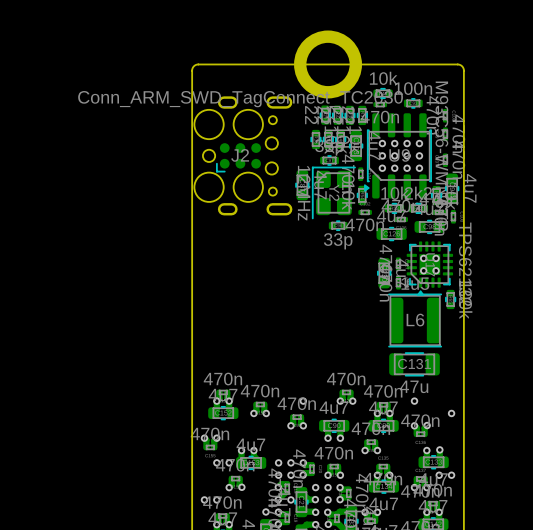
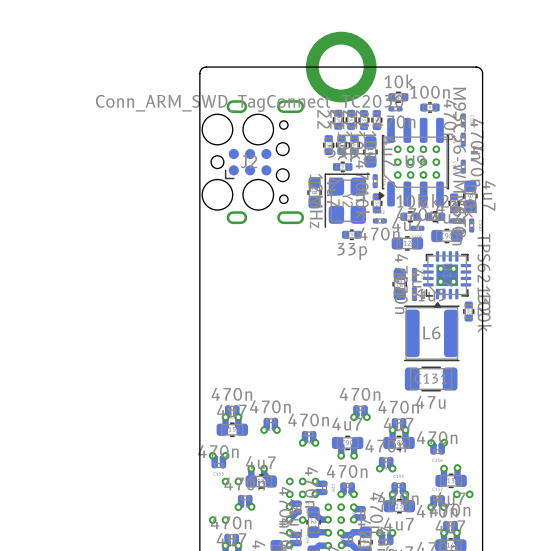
via: (303, 401) -> none
via: (414, 401) -> none
via: (451, 413) -> none
via: (265, 511) -> none

